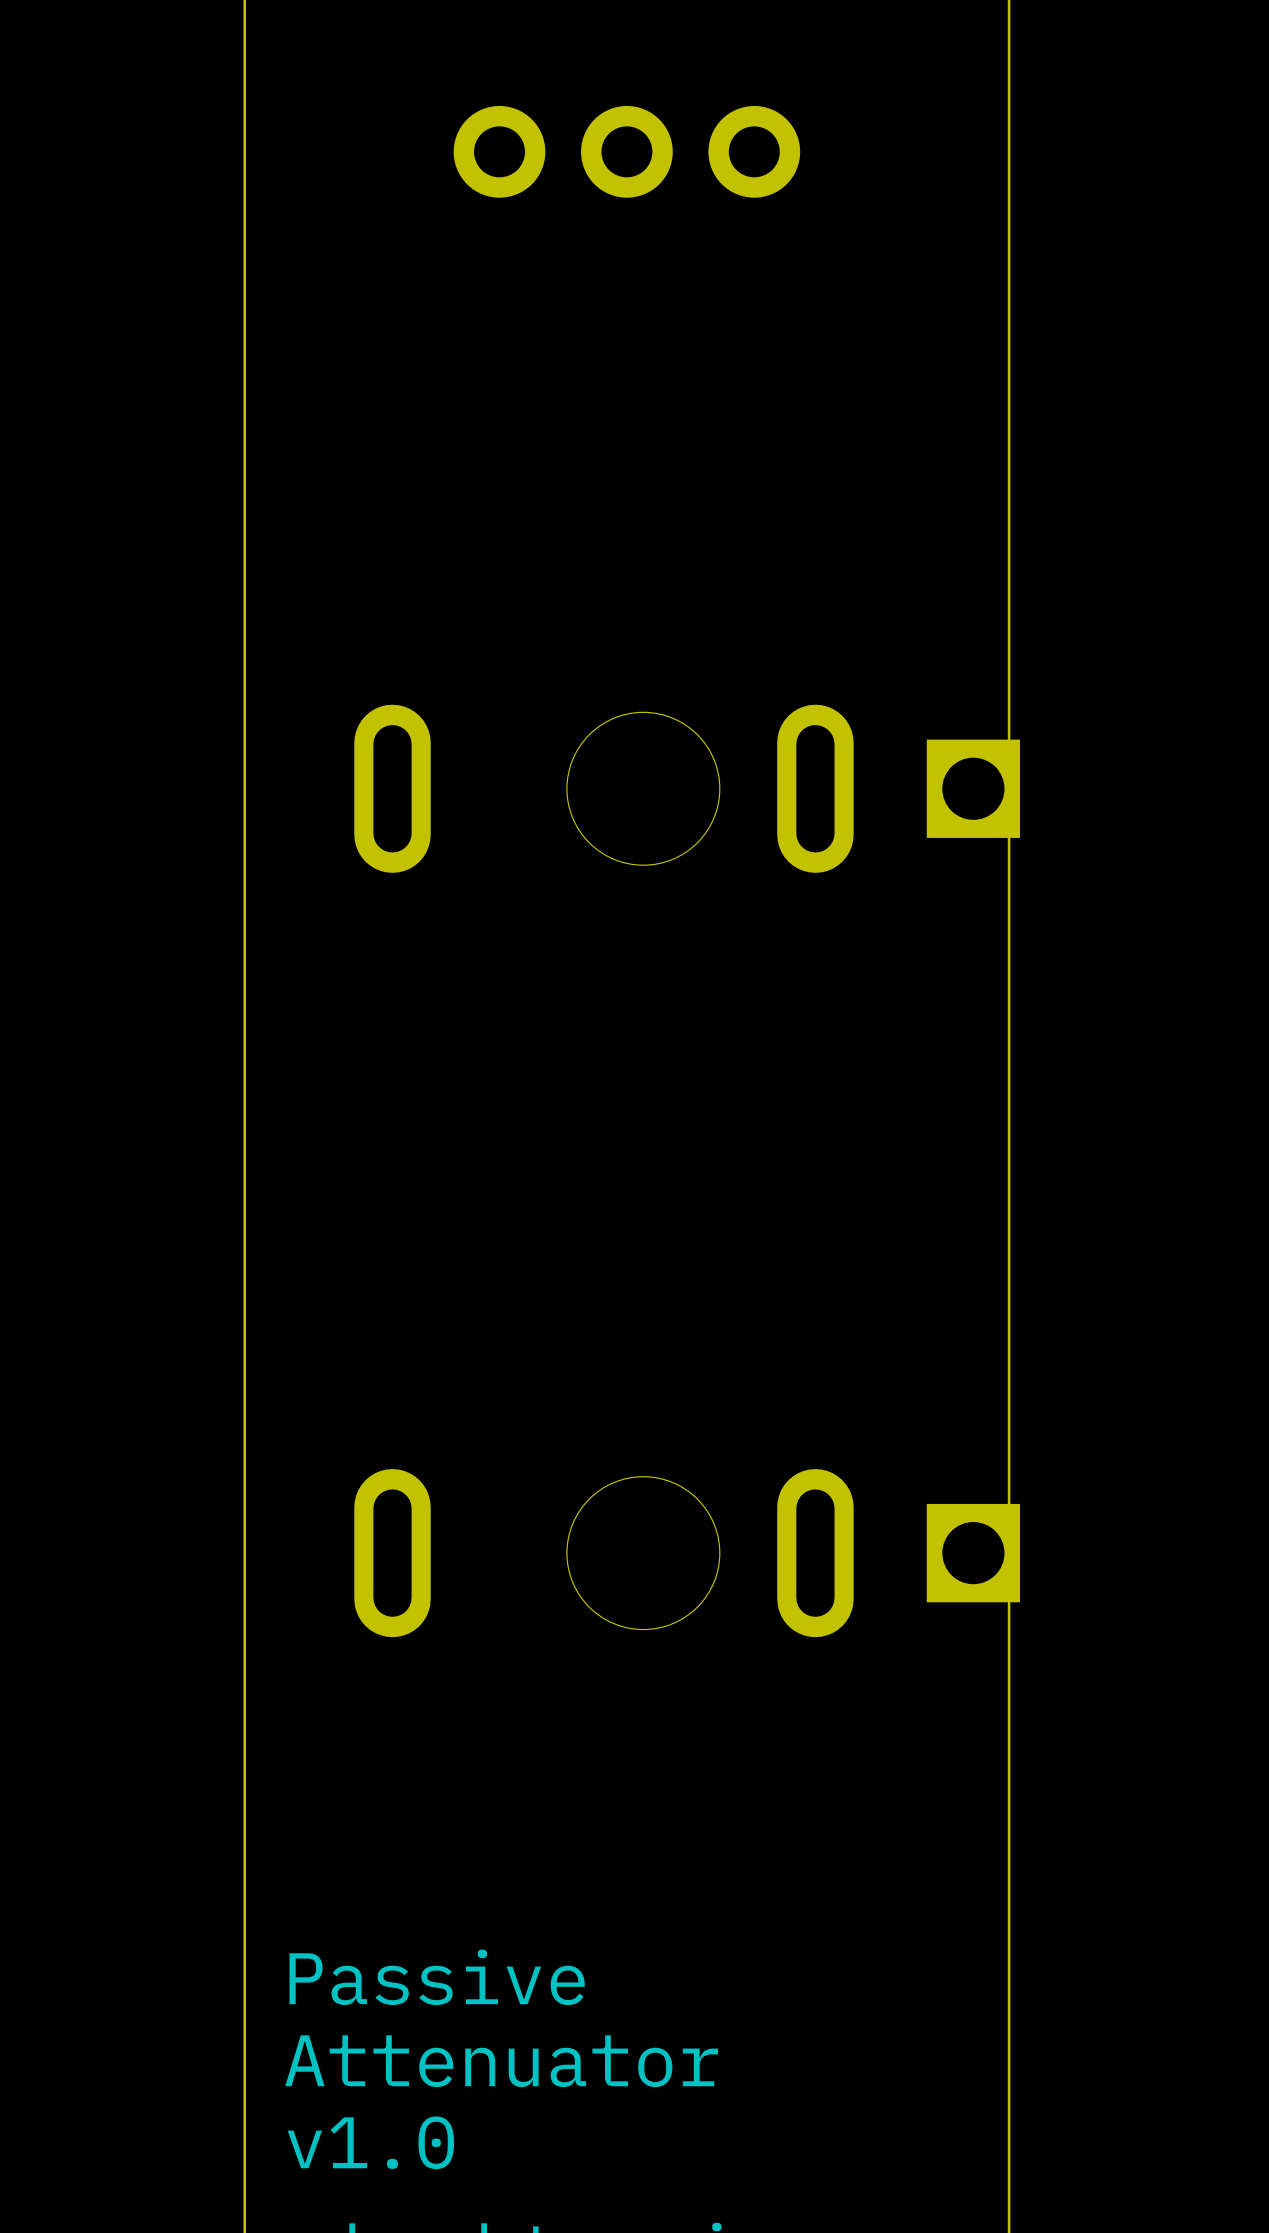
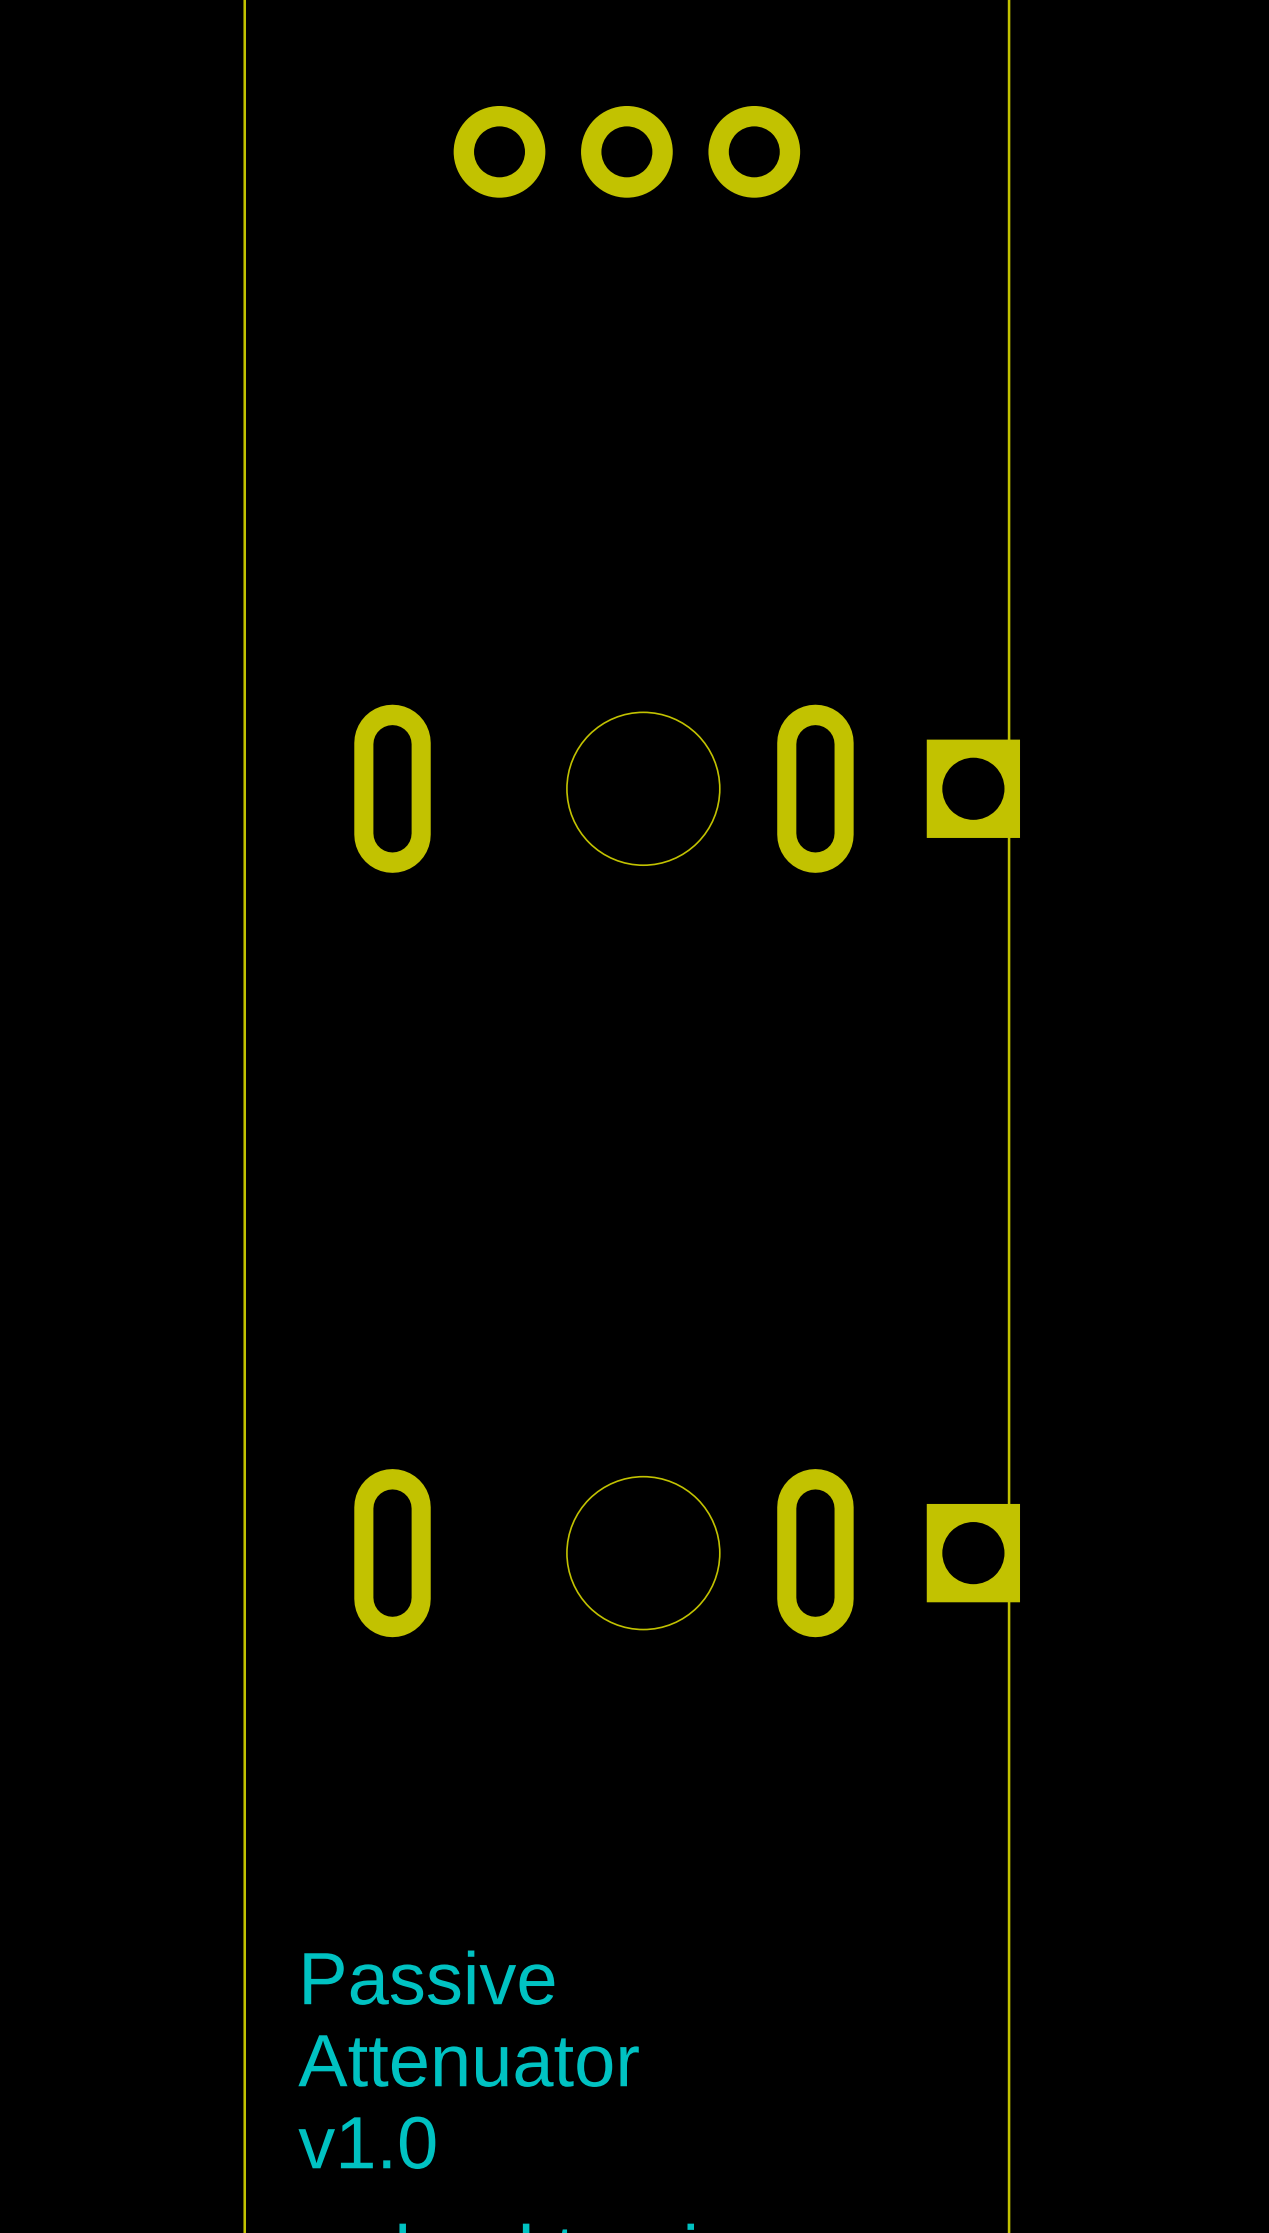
text position: Passive (437, 1977) -> Passive (429, 1977)
text position: Attenuator (501, 2061) -> Attenuator (468, 2061)
text position: v1.0 (370, 2142) -> v1.0 (366, 2142)

